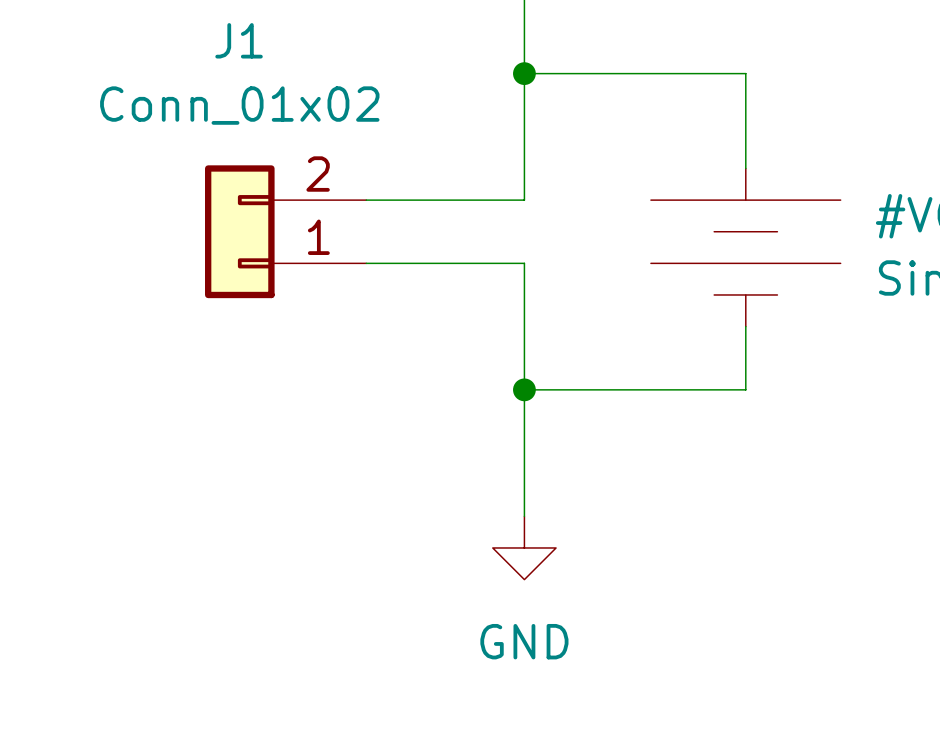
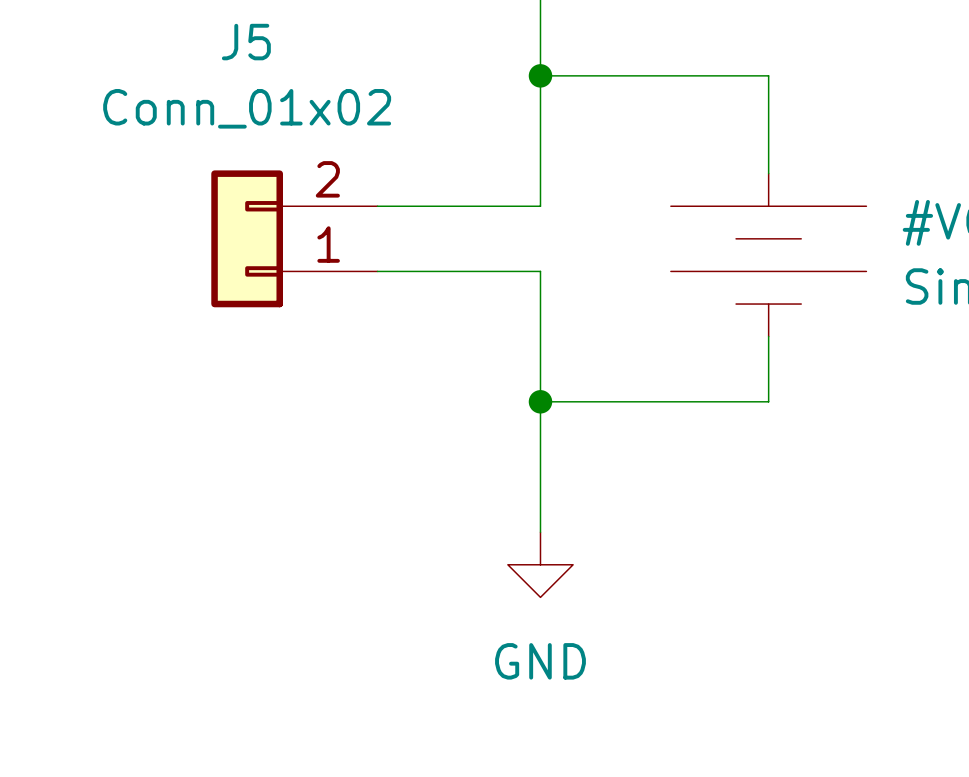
J1 name: J1 (239, 40) -> J5 (246, 42)

